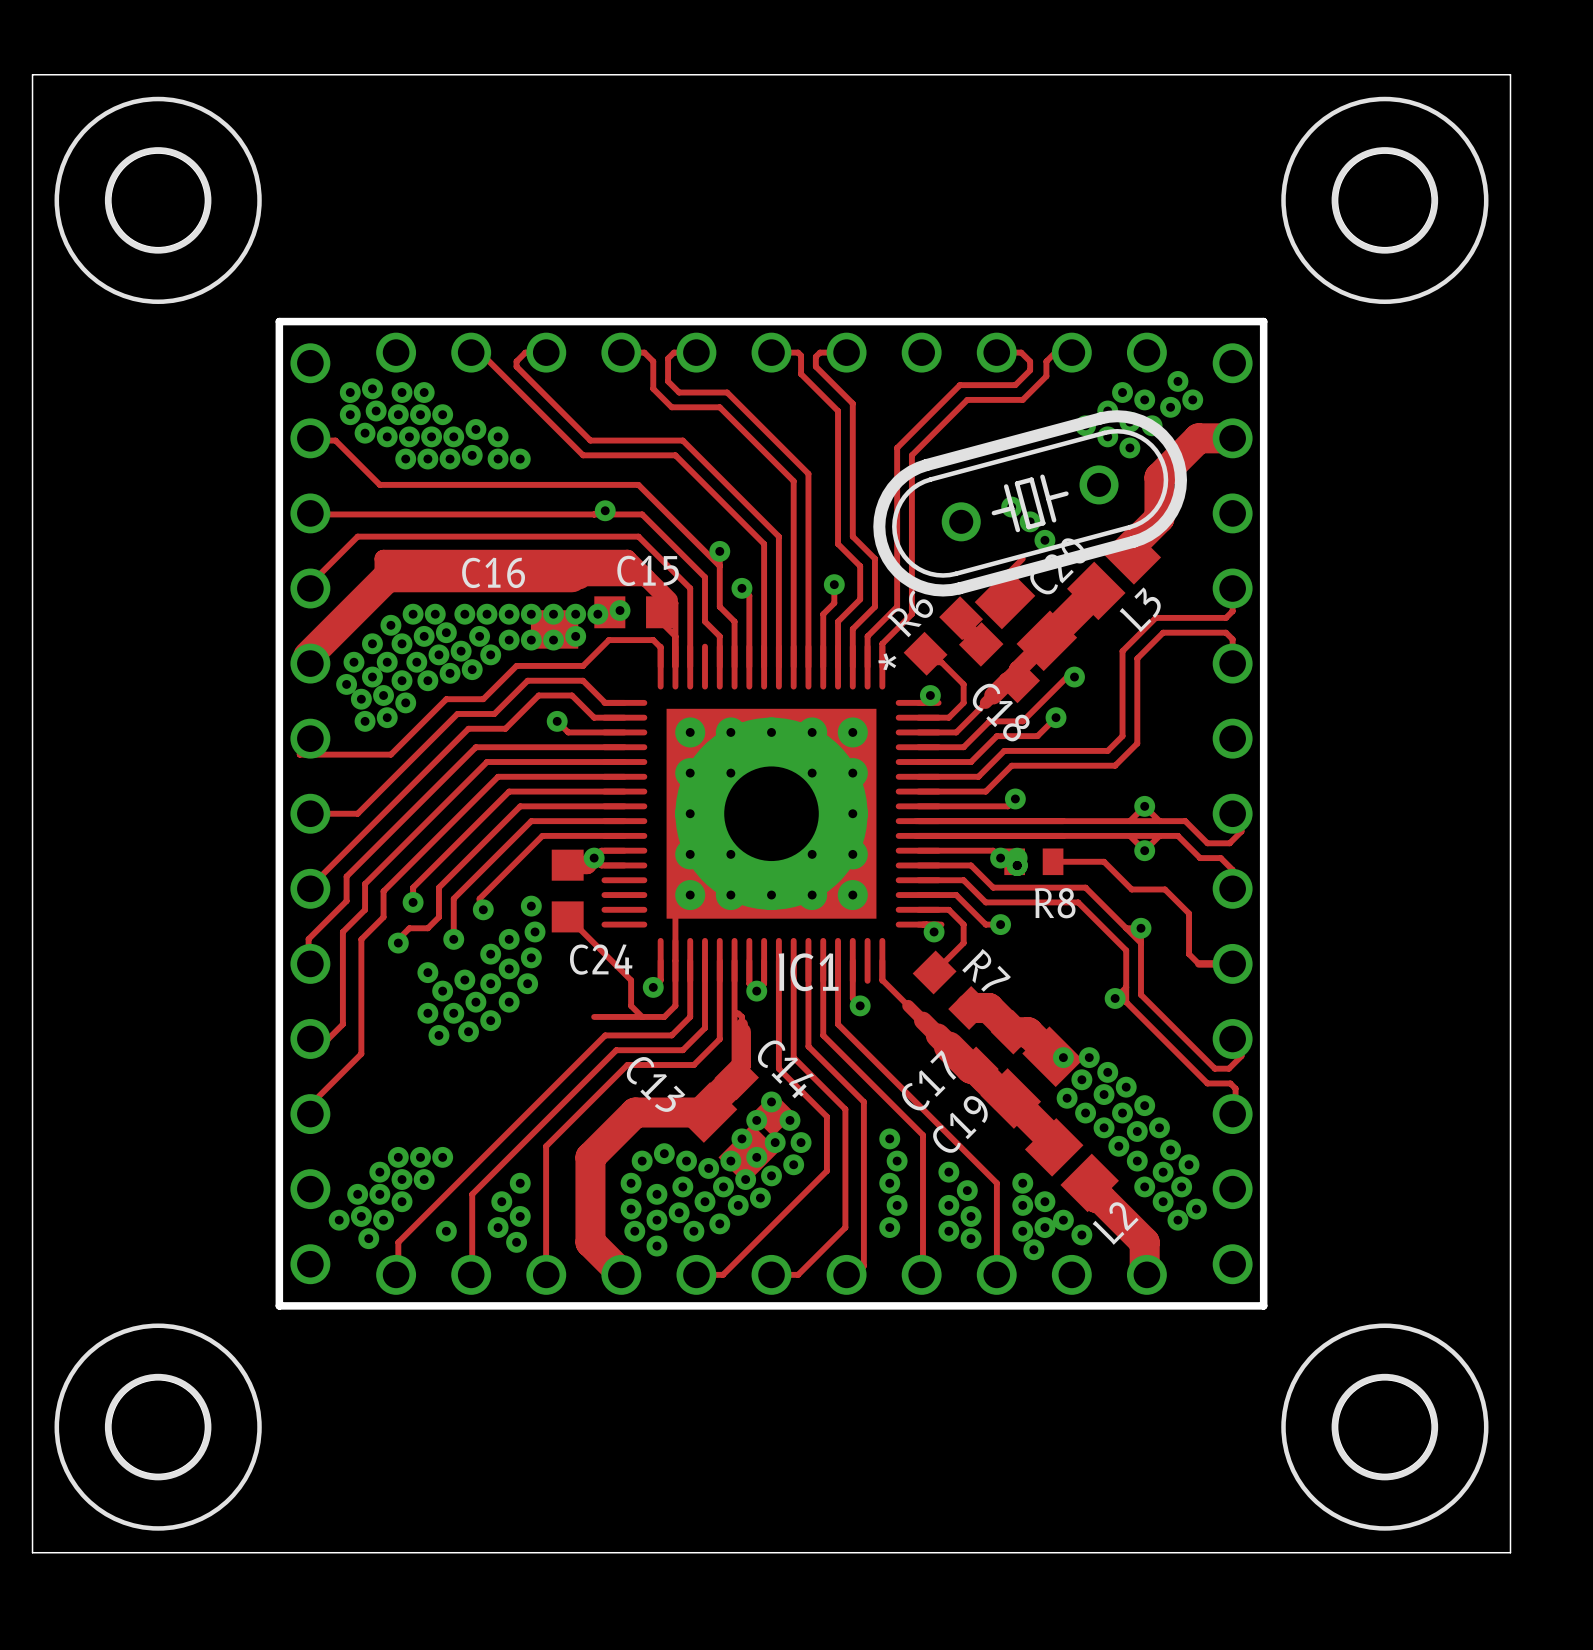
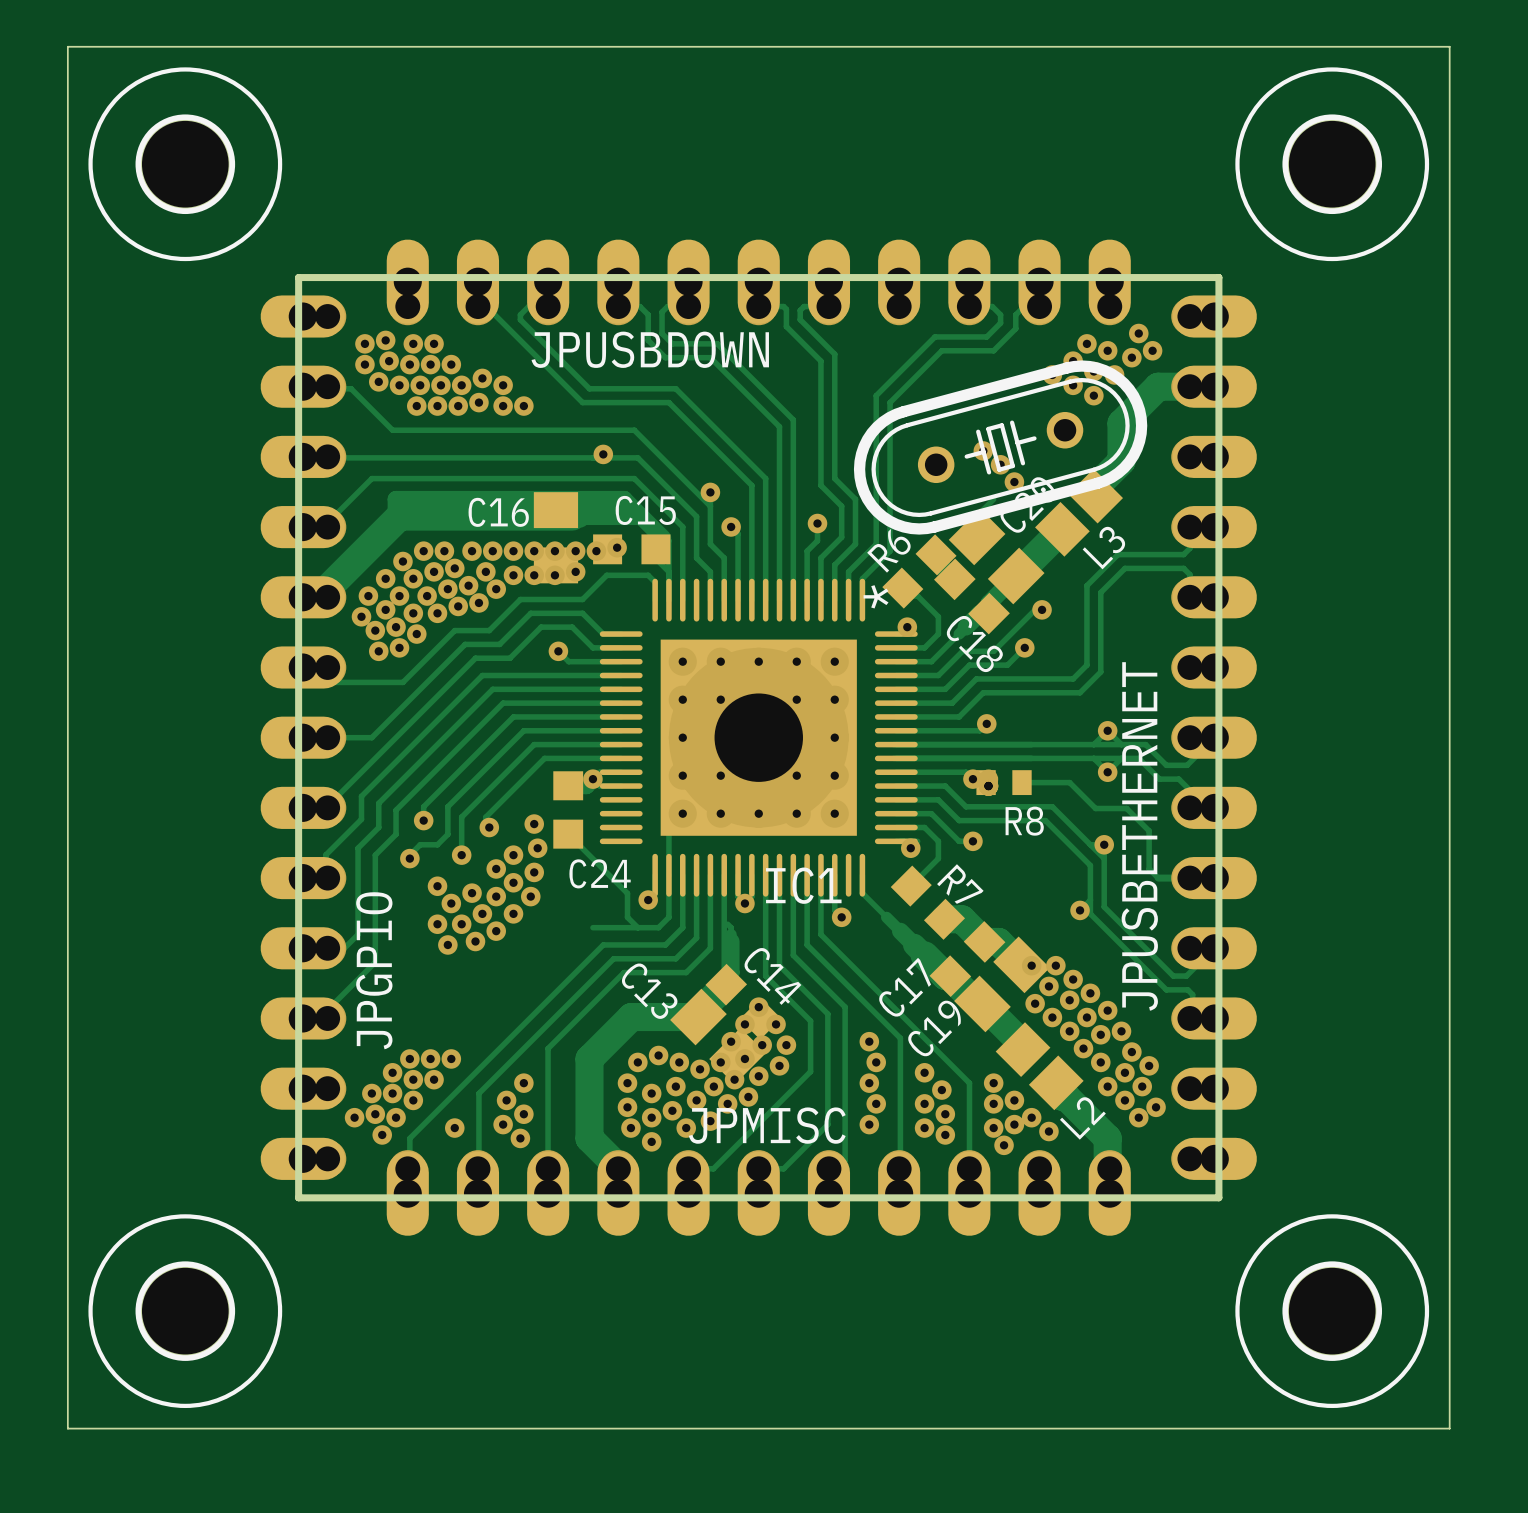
JPUSBDOWN: none -> (758, 281)
JPGPIO: none -> (302, 737)
JPUSBETHERNET: none -> (1214, 737)
JPMISC: none -> (758, 1193)

